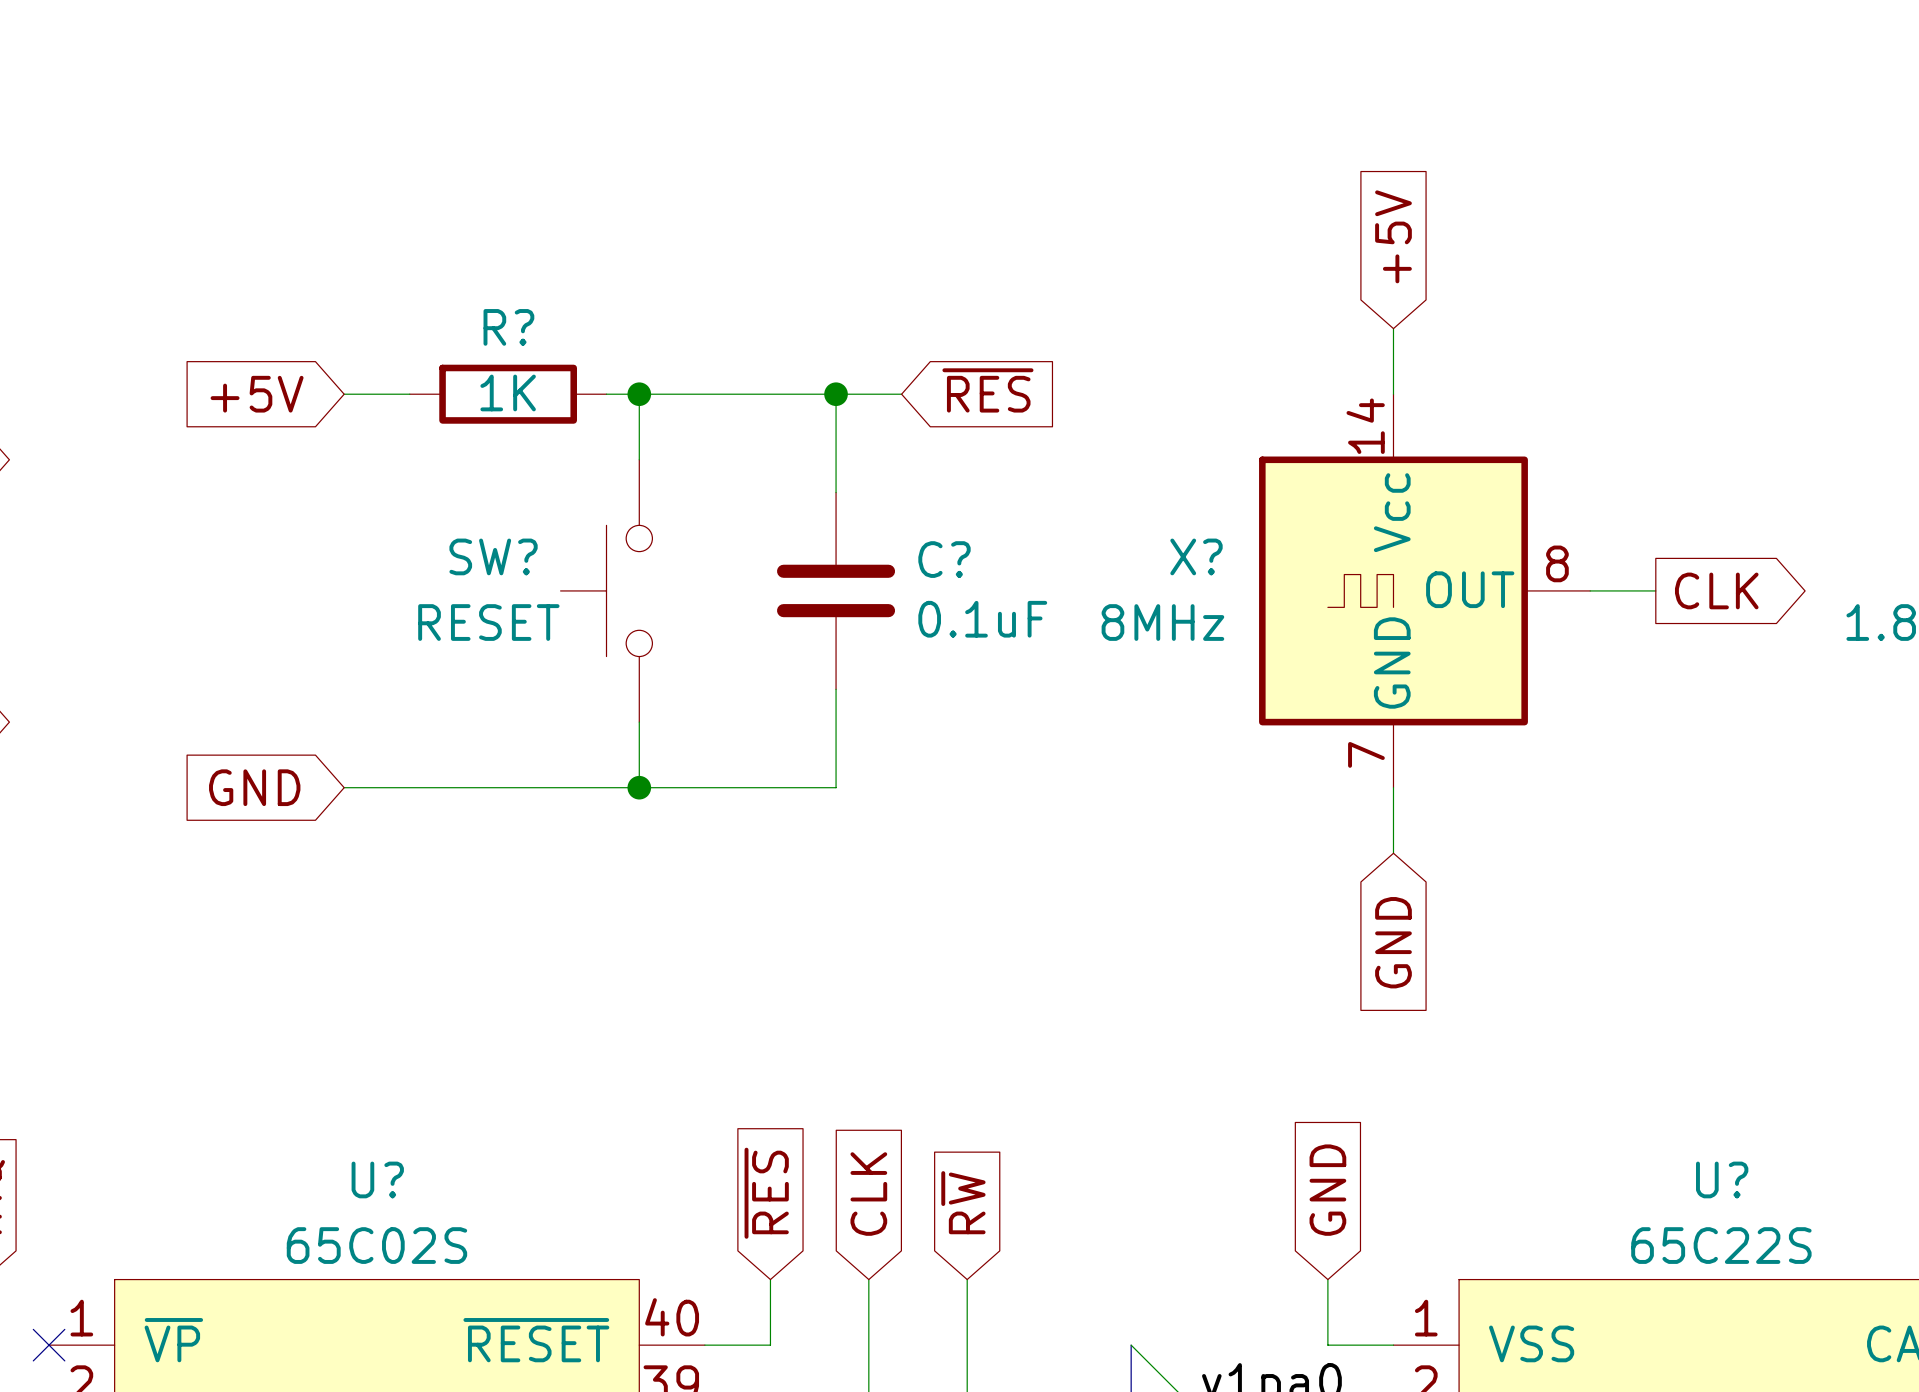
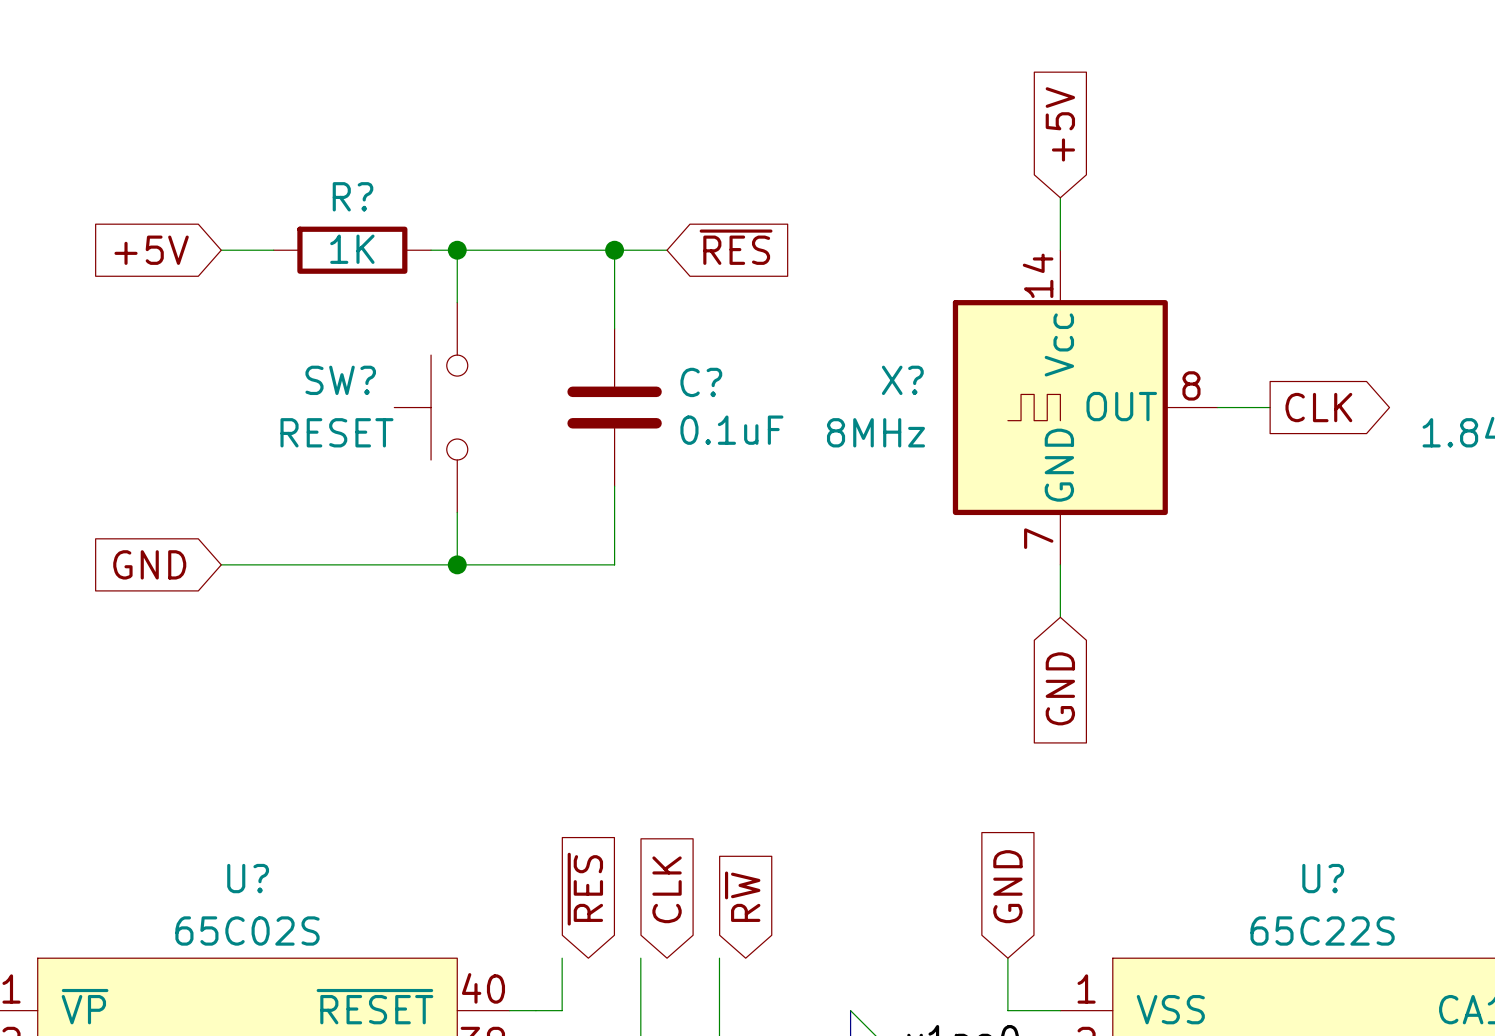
global label position: ~{RES} (766, 1193) -> ~{RES} (585, 889)
global label position: CLK (868, 1194) -> CLK (667, 889)
global label position: R~{W} (963, 1202) -> R~{W} (742, 896)

